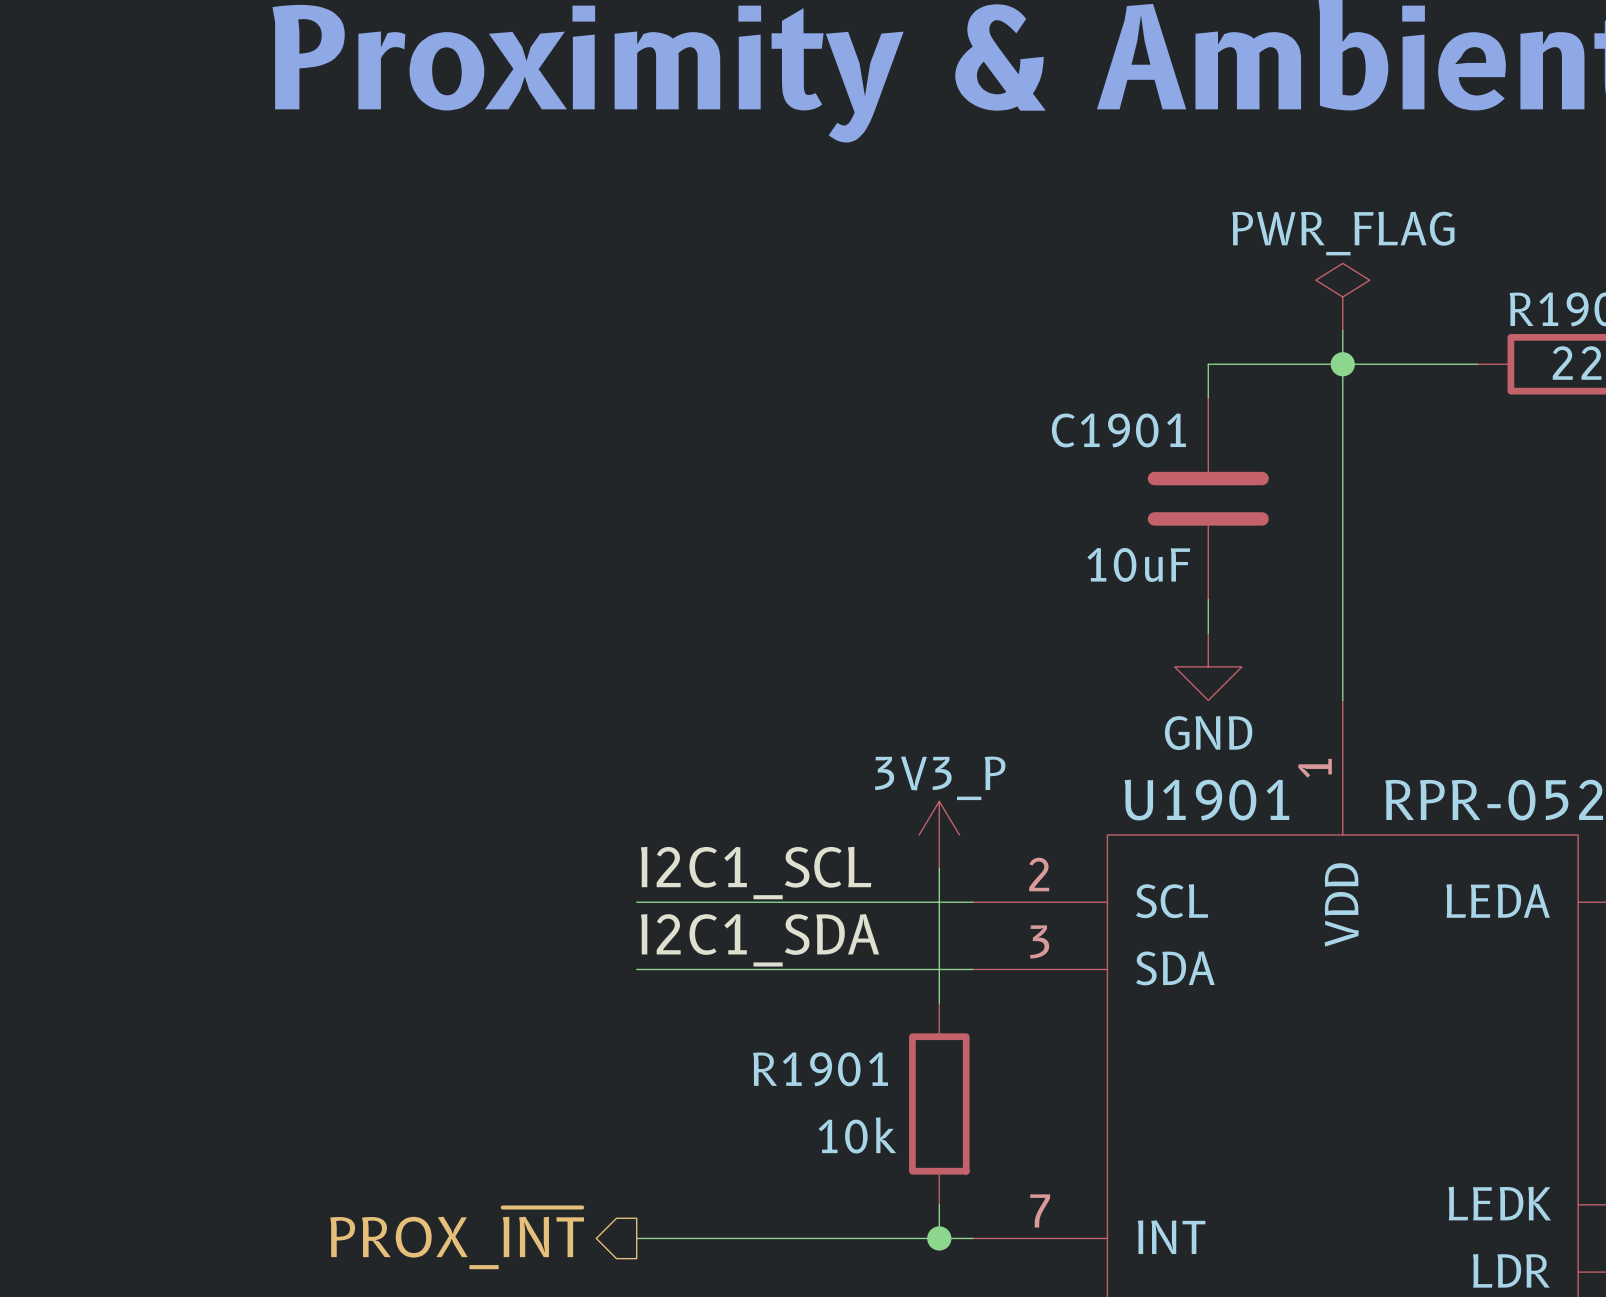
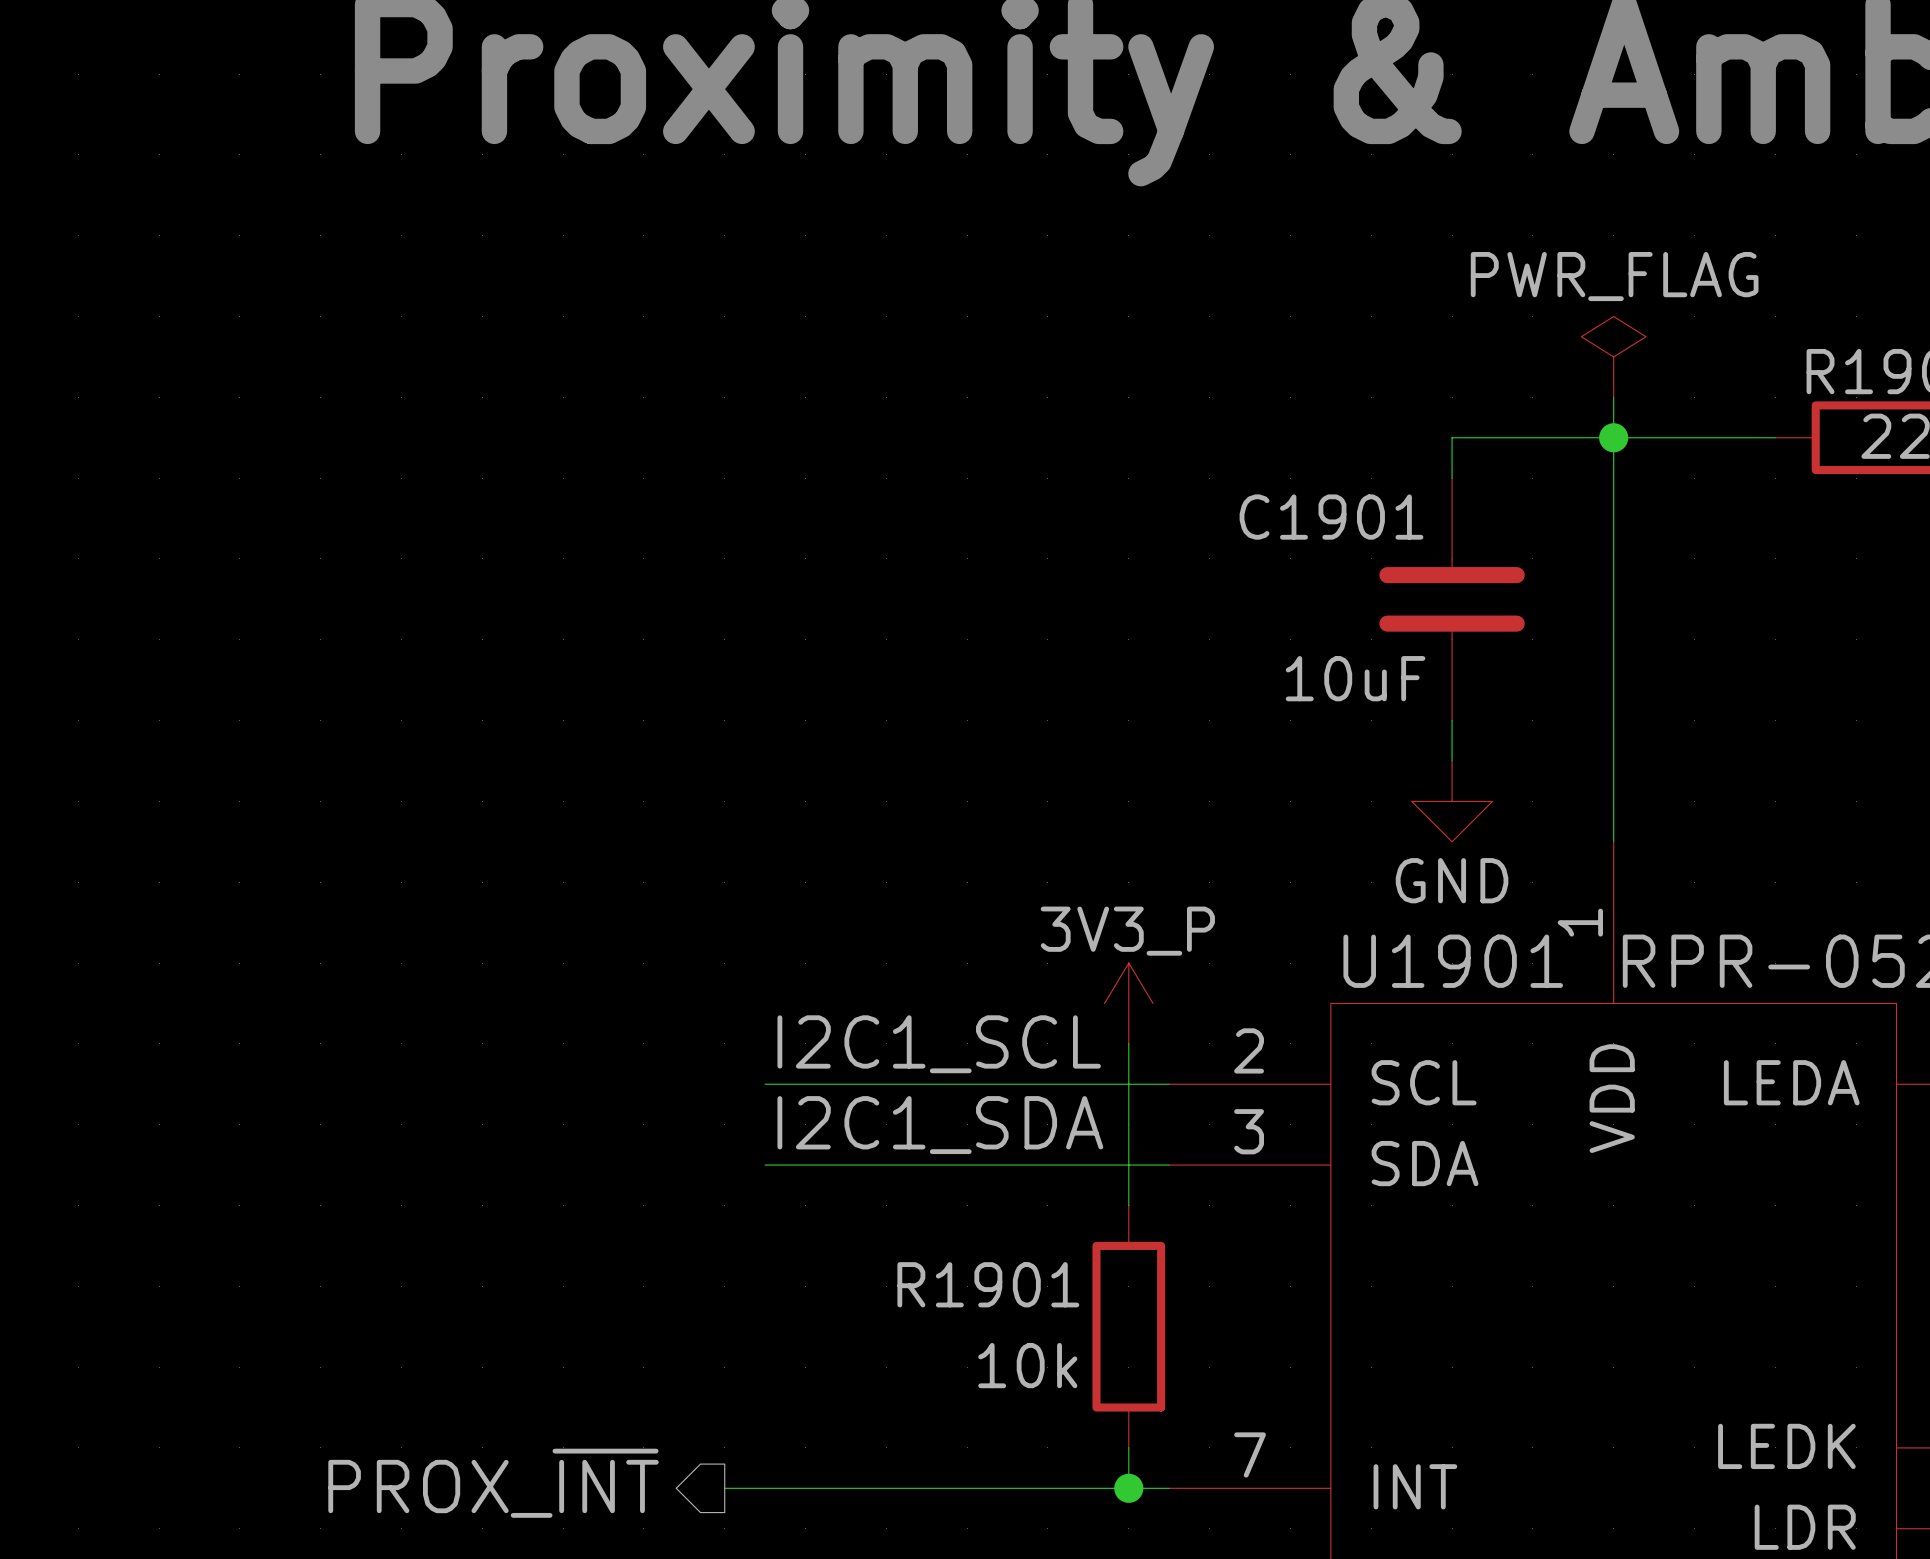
hierarchical label position: PROX_~{INT} (457, 1238) -> PROX_~{INT} (493, 1483)
wire: none -> (724, 1488) (765, 1488)

